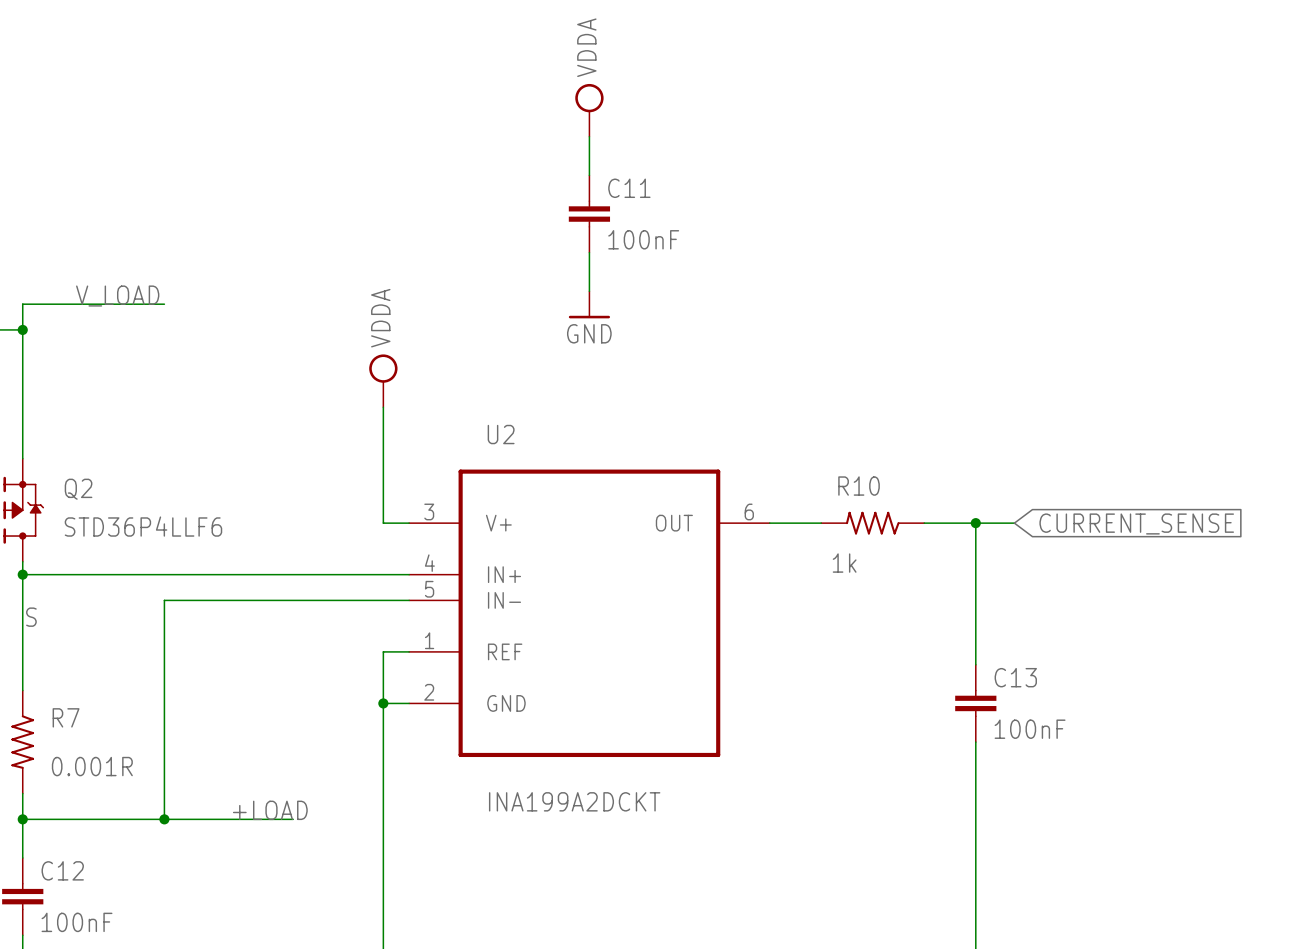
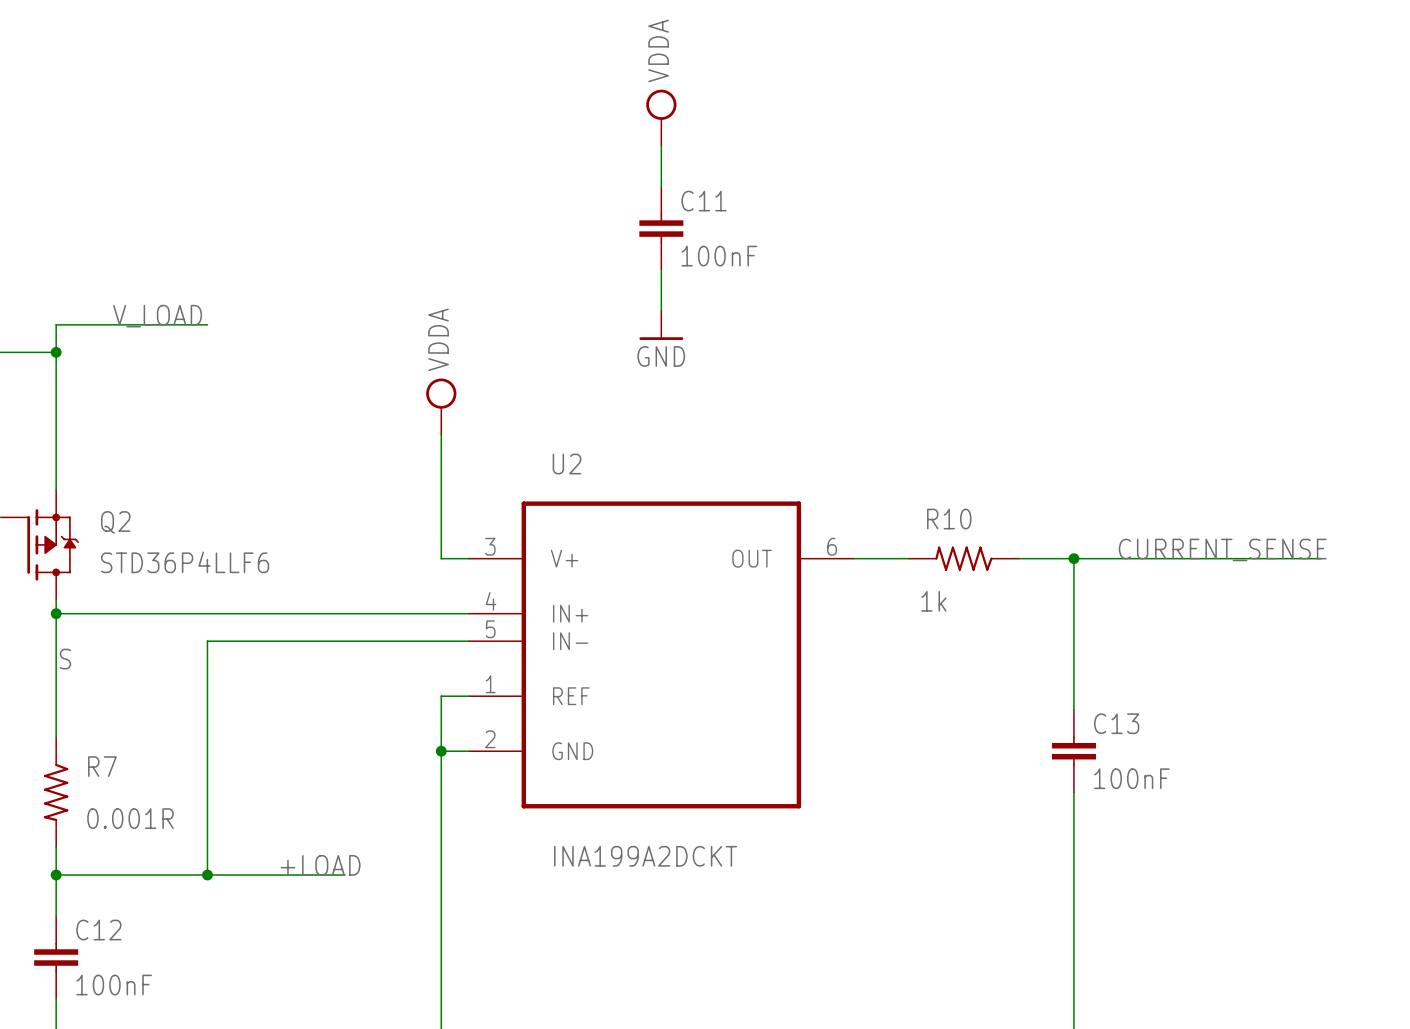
label: none -> CURRENT_SENSE (1222, 549)
wire: none -> (1115, 558) (1321, 558)
global label: CURRENT_SENSE (1136, 523) -> none

